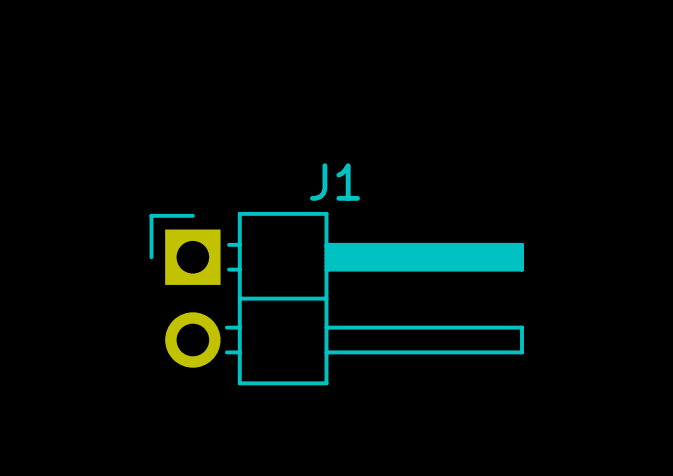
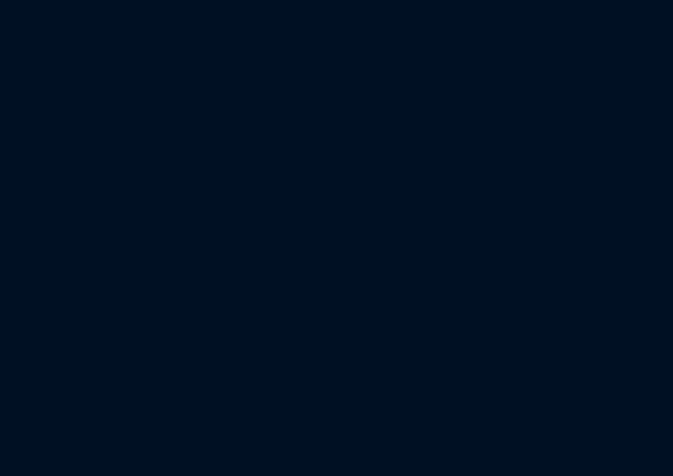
J1: (336, 298) -> none

